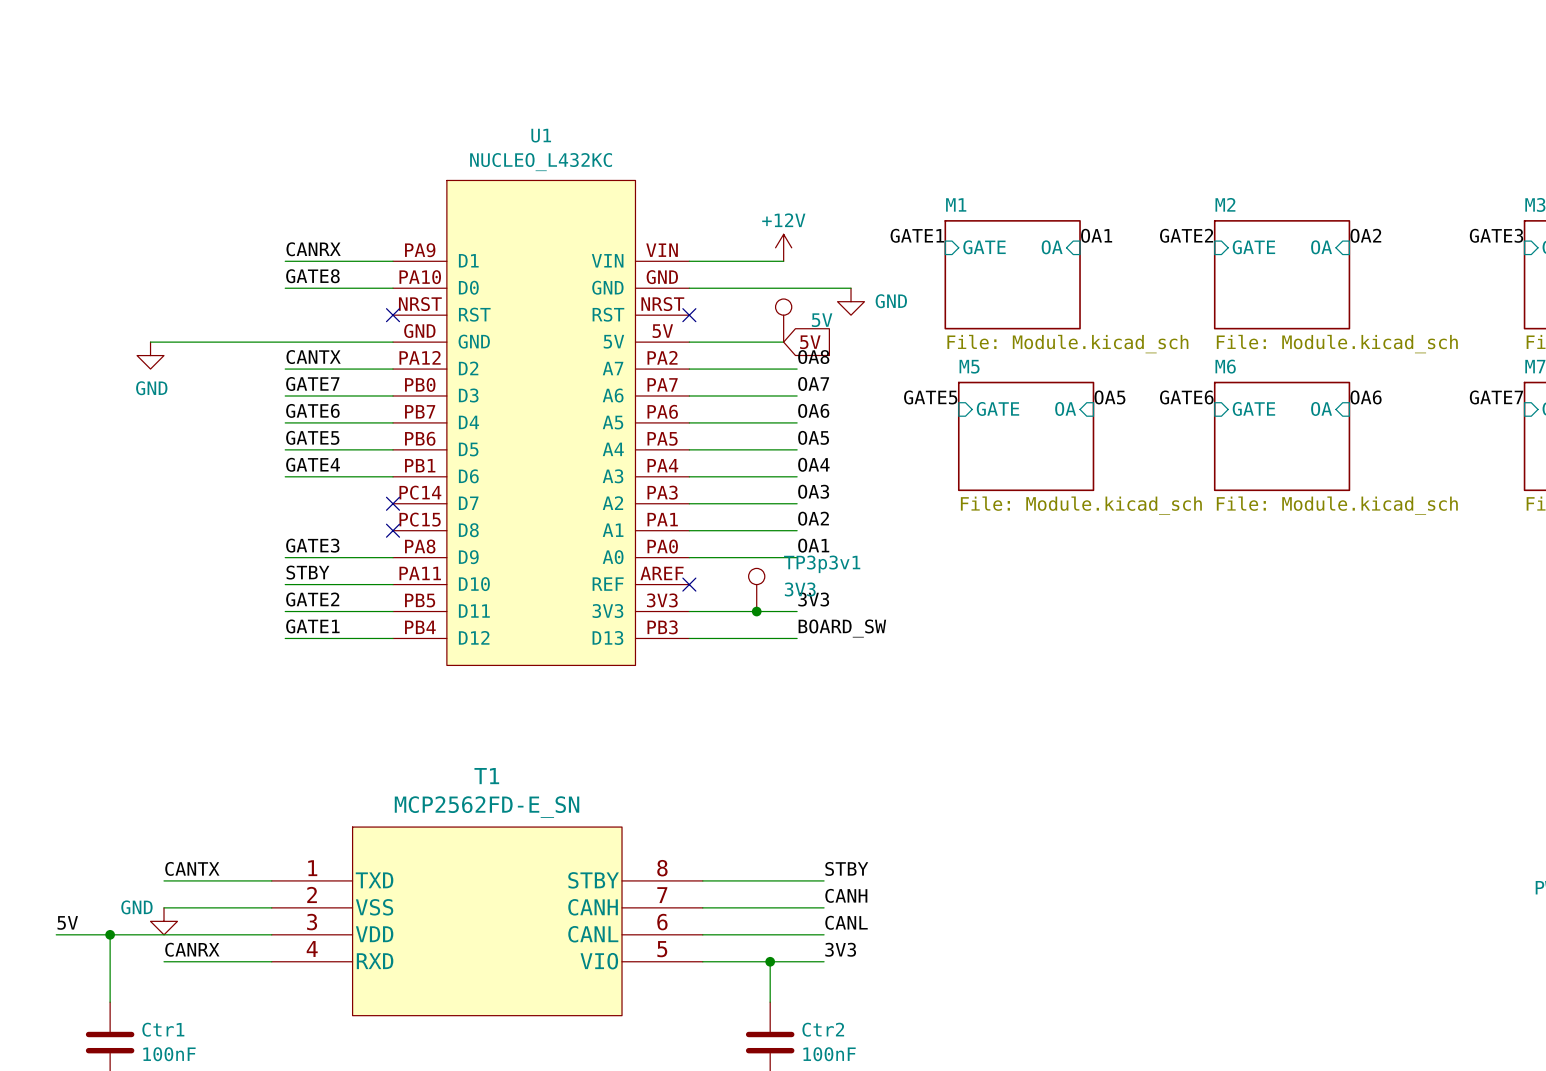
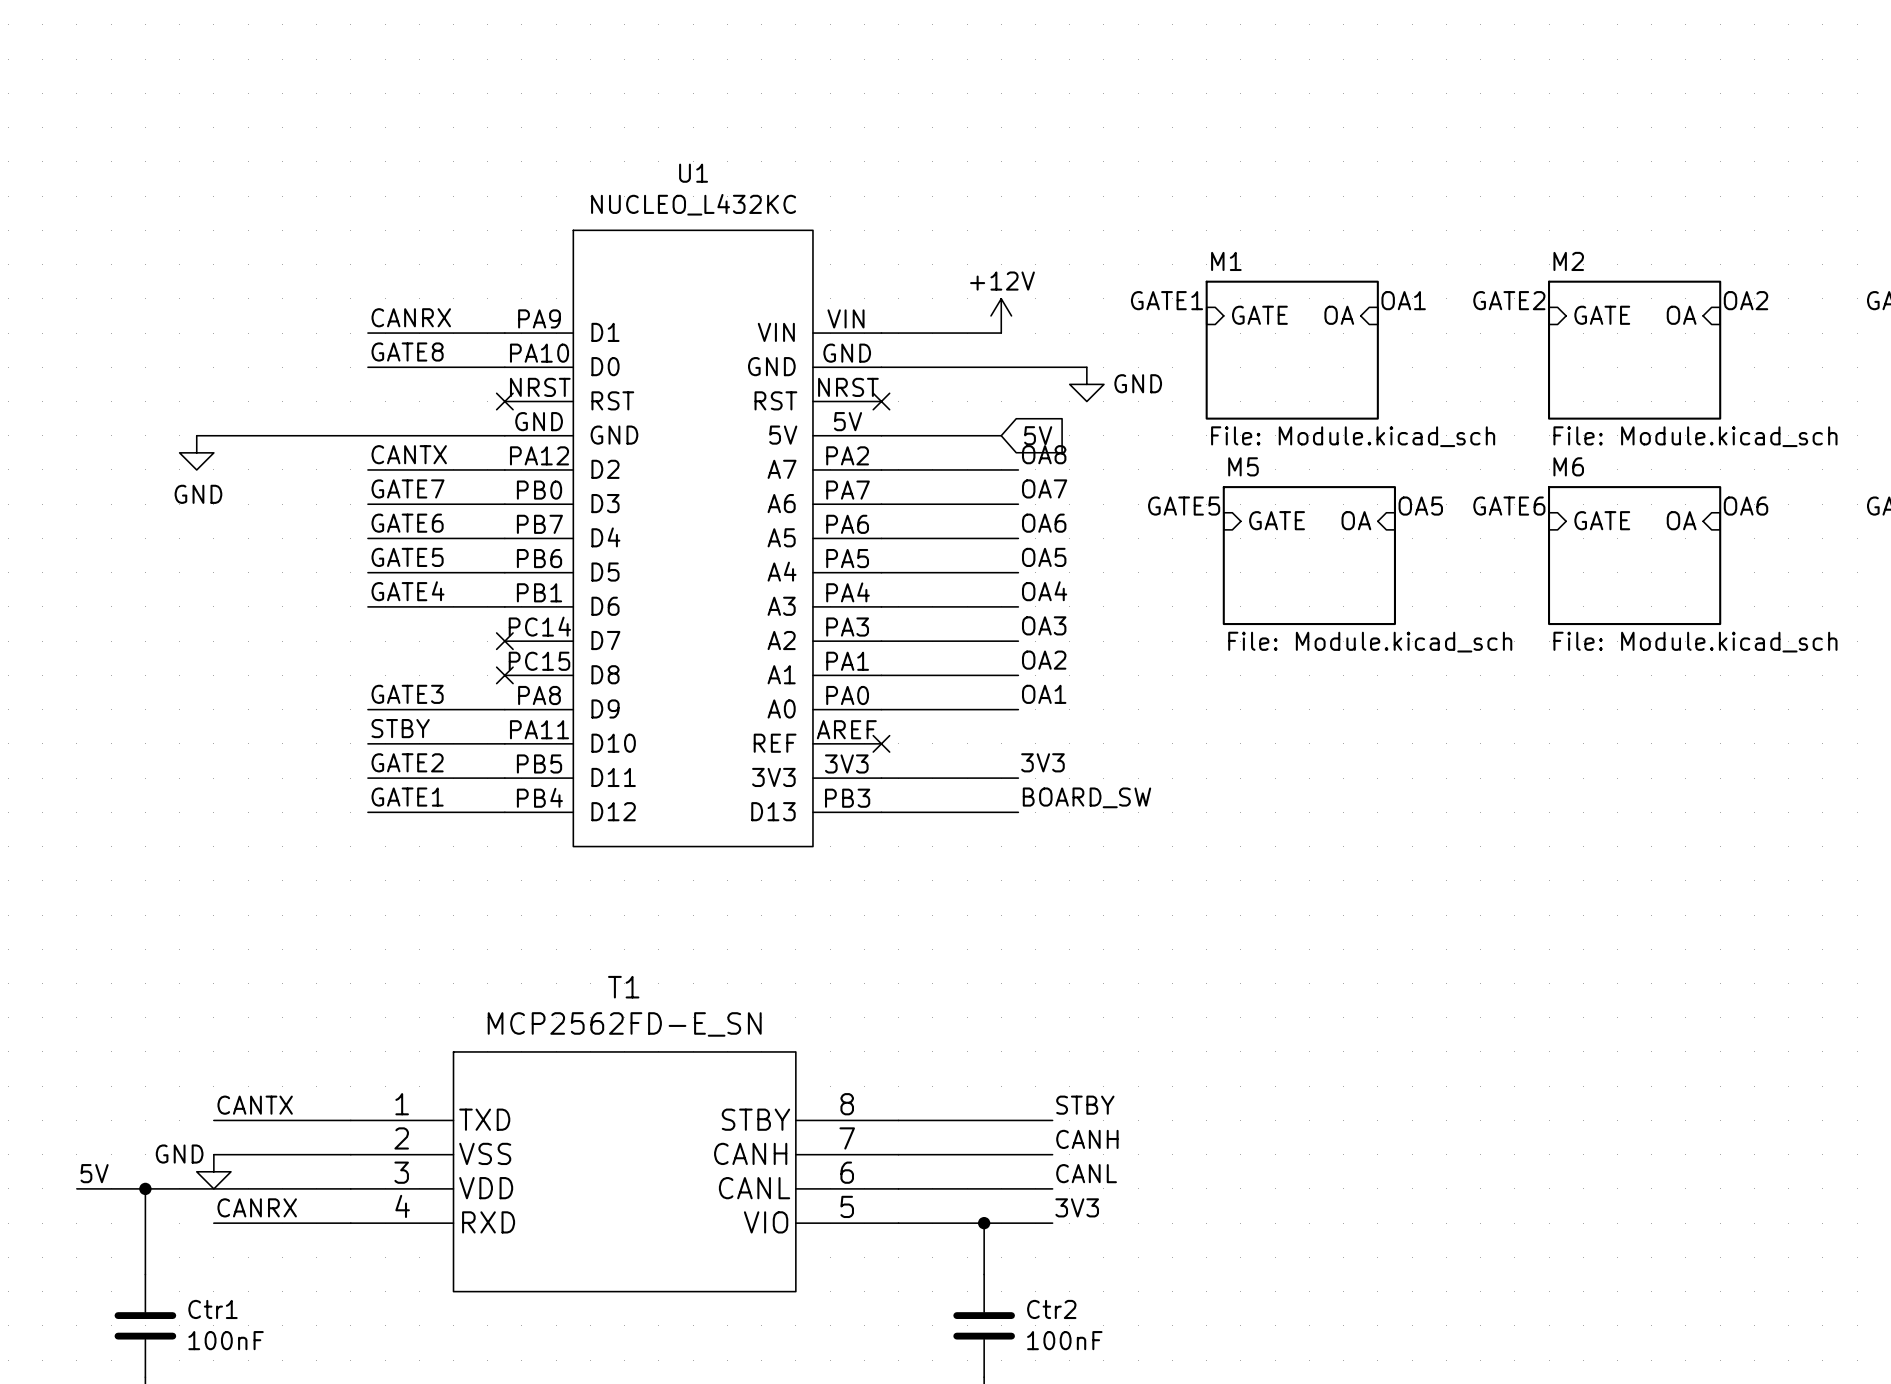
part: 5V (783, 320) -> none
TP3p3v1: 3V3 (756, 589) -> none
junction: (756, 611) -> none

